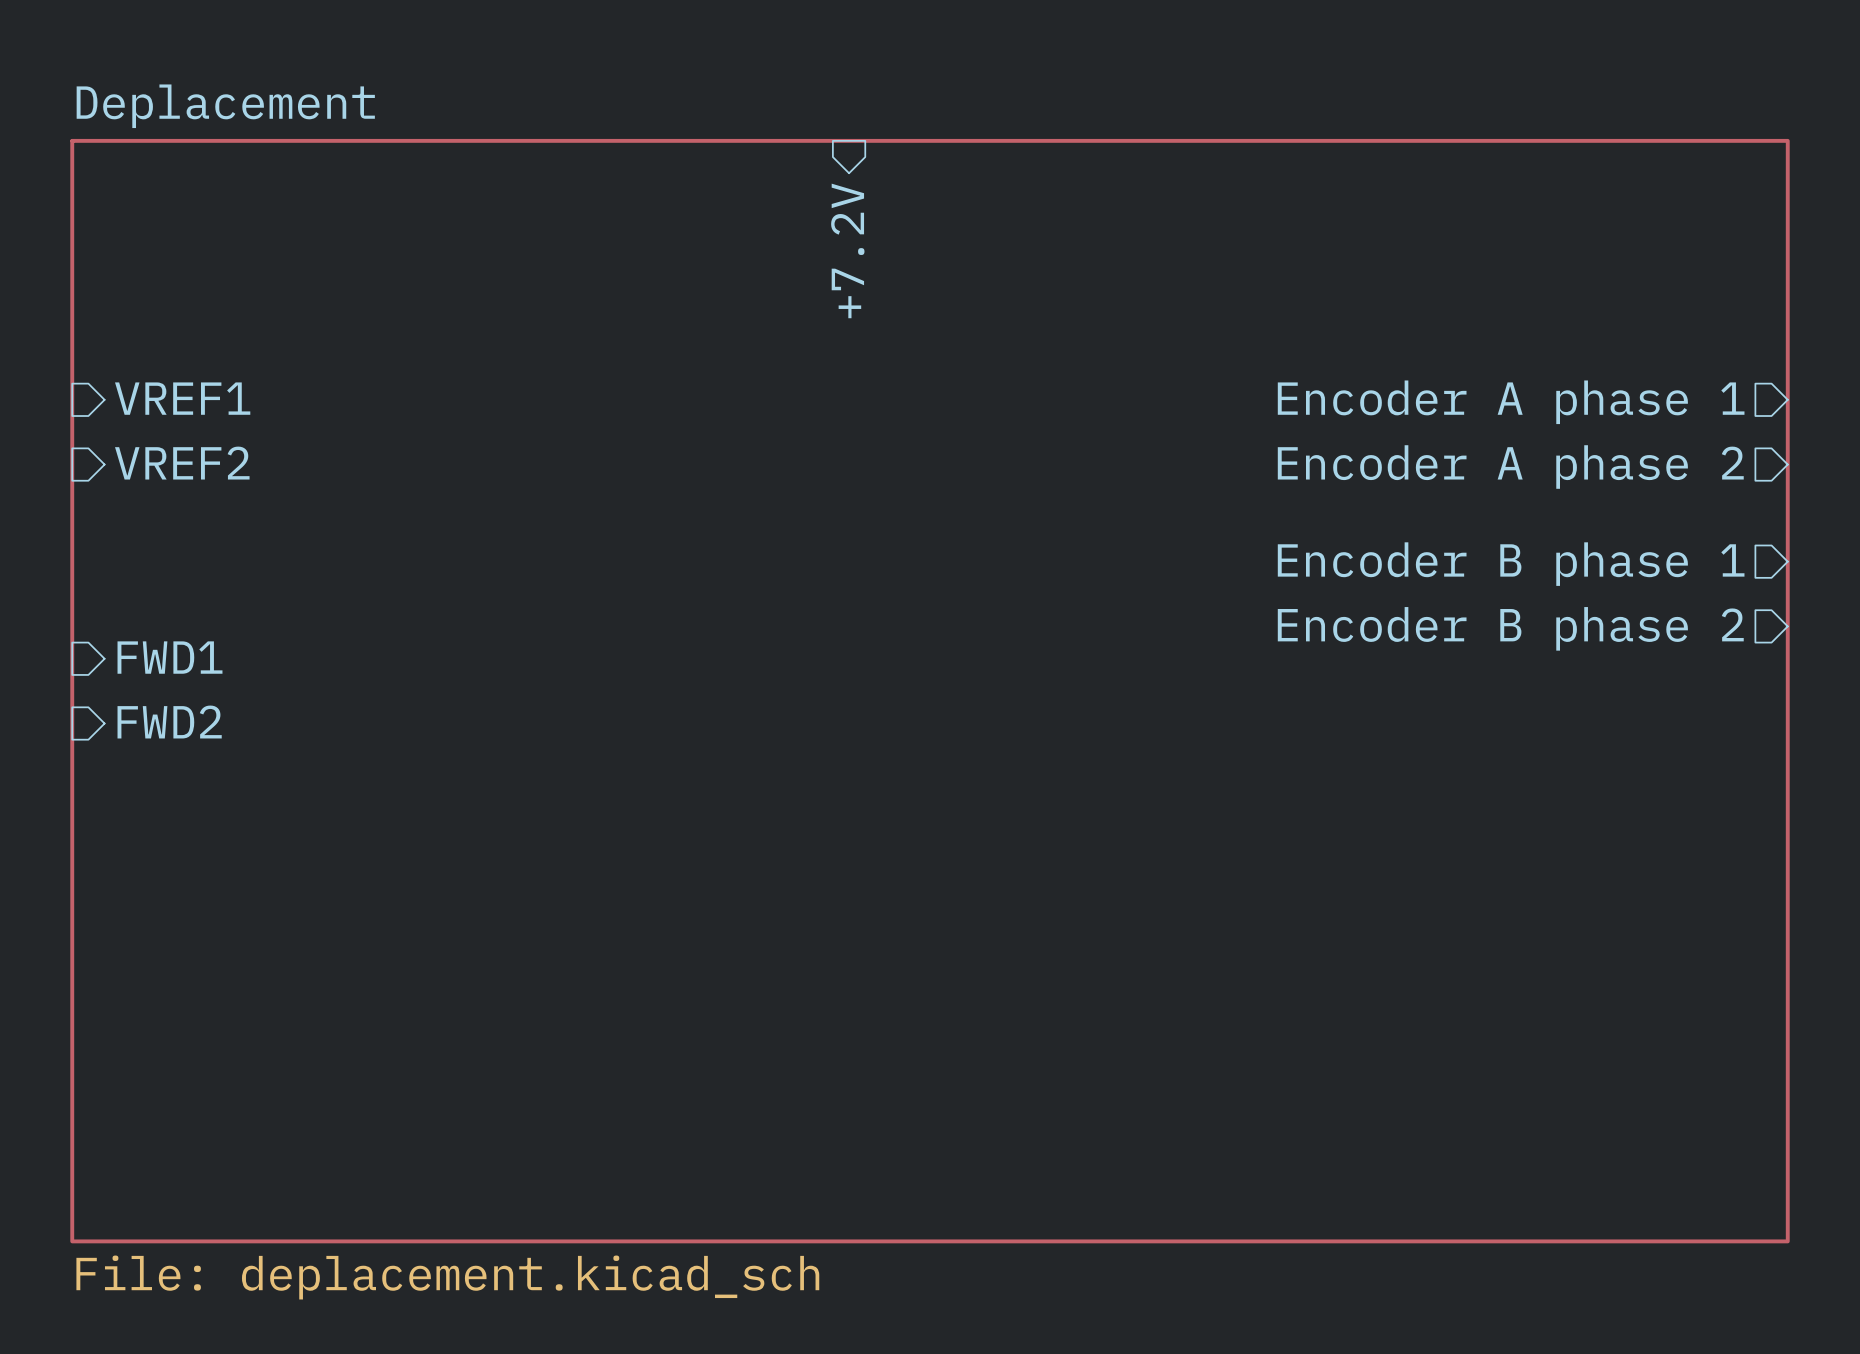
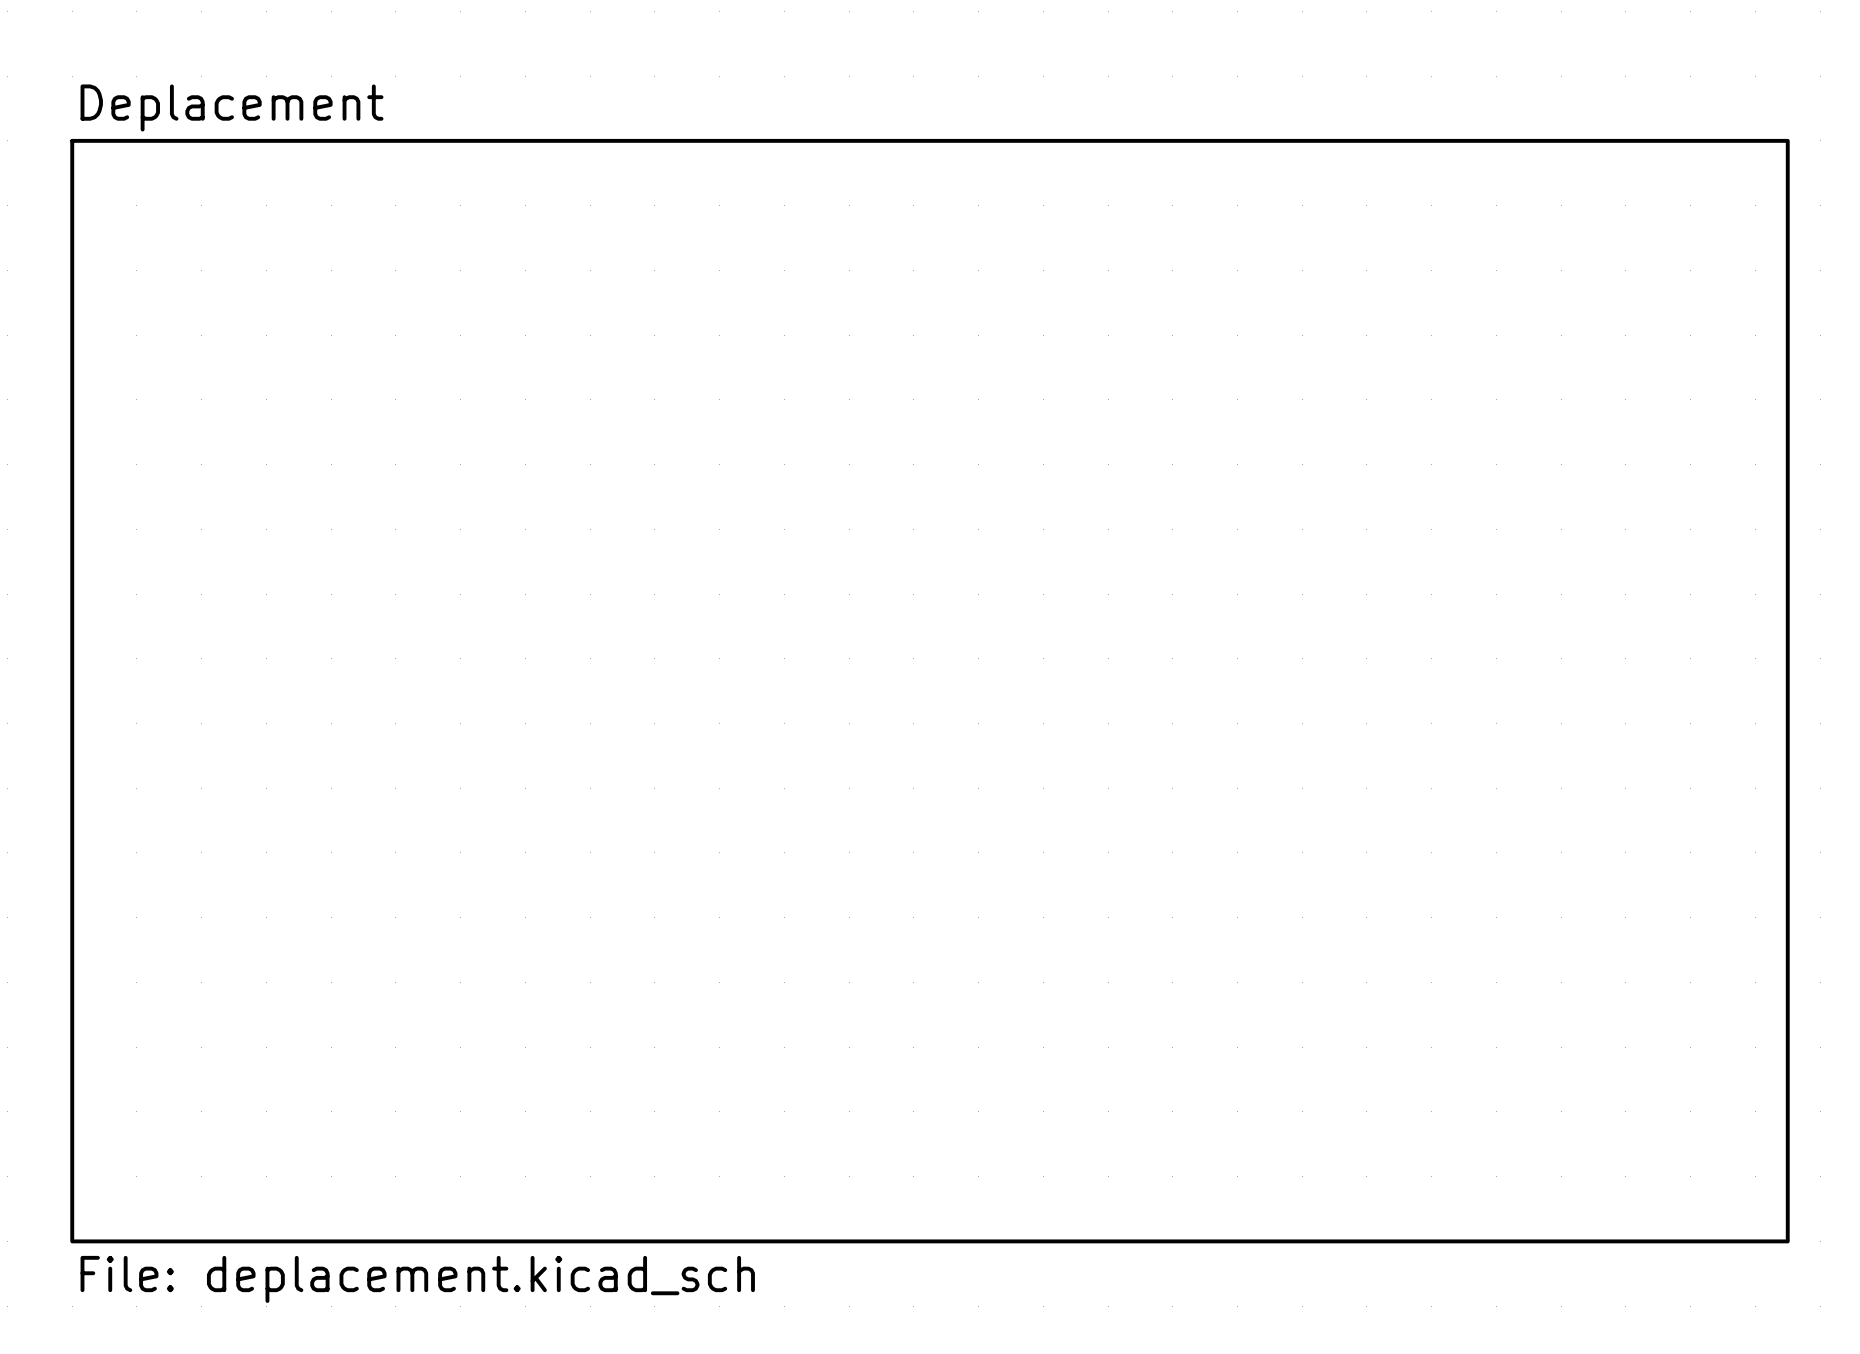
sheet pin: +7.2V (847, 250) -> none
sheet pin: VREF1 (182, 398) -> none
sheet pin: Encoder A phase 1 (1511, 402) -> none
sheet pin: VREF2 (182, 463) -> none
sheet pin: Encoder A phase 2 (1510, 467) -> none
sheet pin: Encoder B phase 1 (1511, 564) -> none
sheet pin: Encoder B phase 2 (1510, 628) -> none
sheet pin: FWD1 (169, 657) -> none
sheet pin: FWD2 (169, 722) -> none

